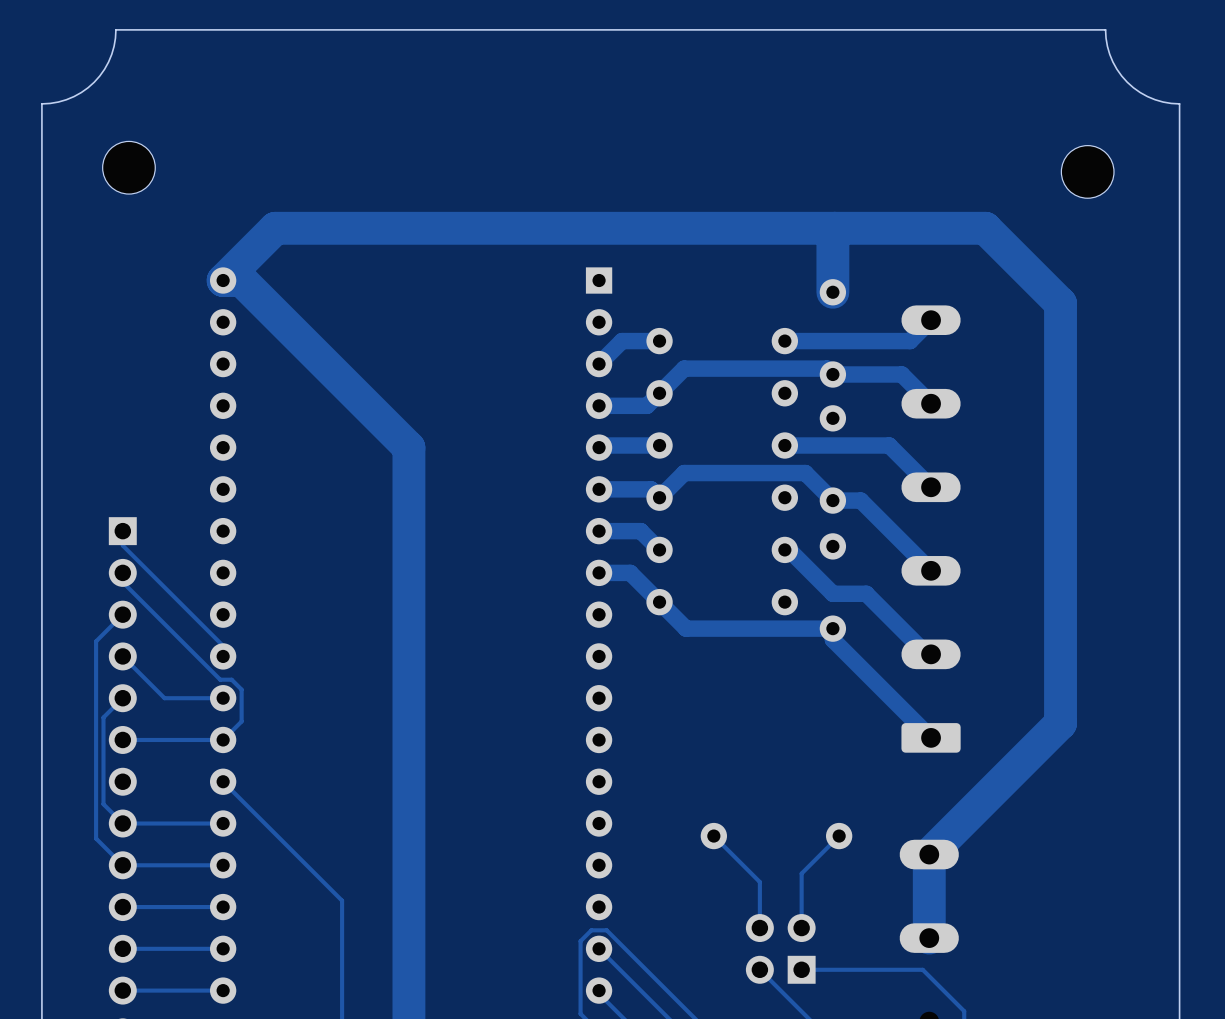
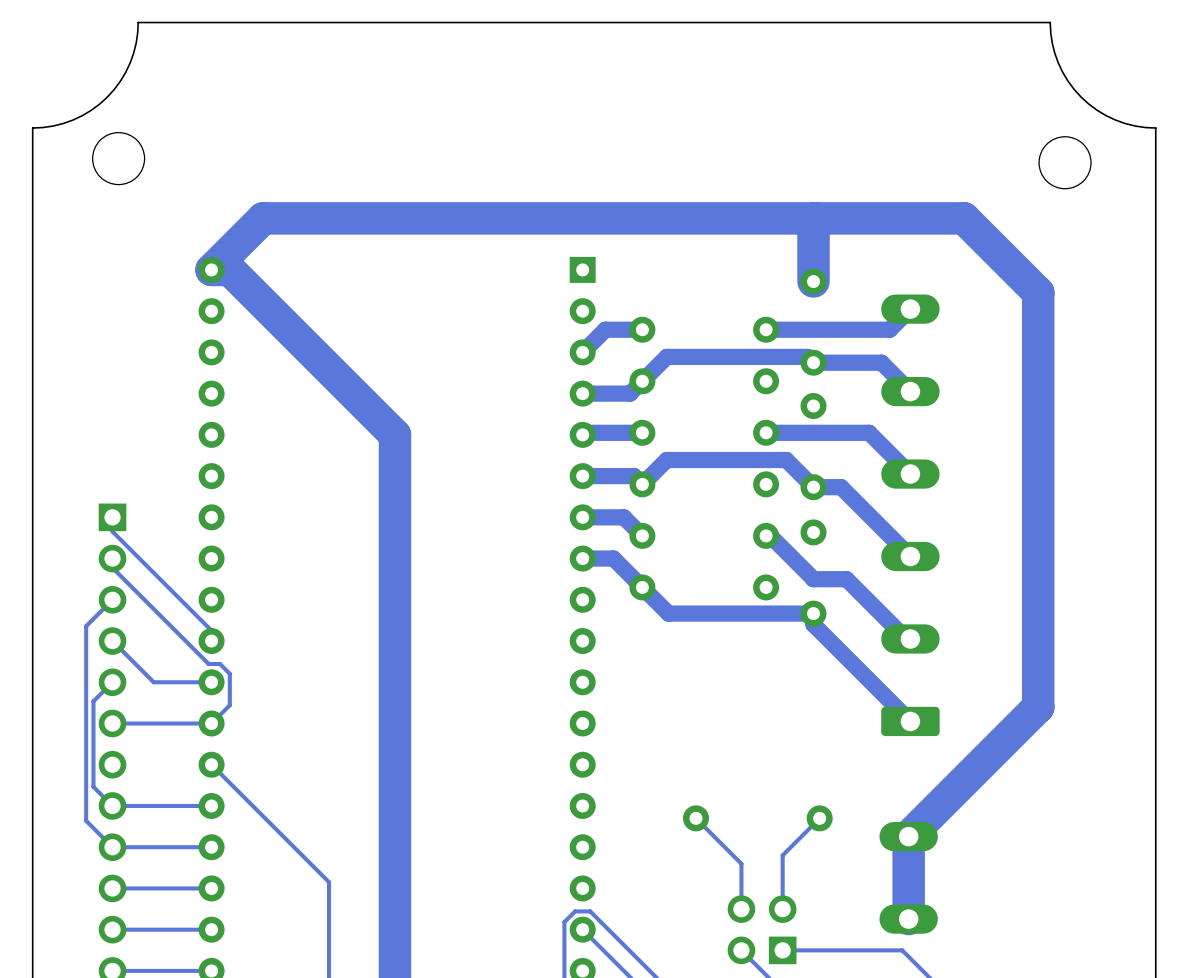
board edge: (148, 29) (115, 29) (111, 54) (104, 69) (94, 82) (74, 96) (58, 102) (41, 103) (41, 136) -> (138, 22) (136, 43) (130, 62) (120, 81) (107, 97) (91, 110) (73, 120) (53, 126) (32, 128)
board edge: (1072, 29) (1105, 29) (1109, 54) (1116, 69) (1127, 82) (1147, 96) (1163, 102) (1179, 103) (1179, 136) -> (1050, 22) (1052, 43) (1058, 62) (1068, 81) (1081, 97) (1097, 110) (1115, 120) (1135, 126) (1155, 128)

